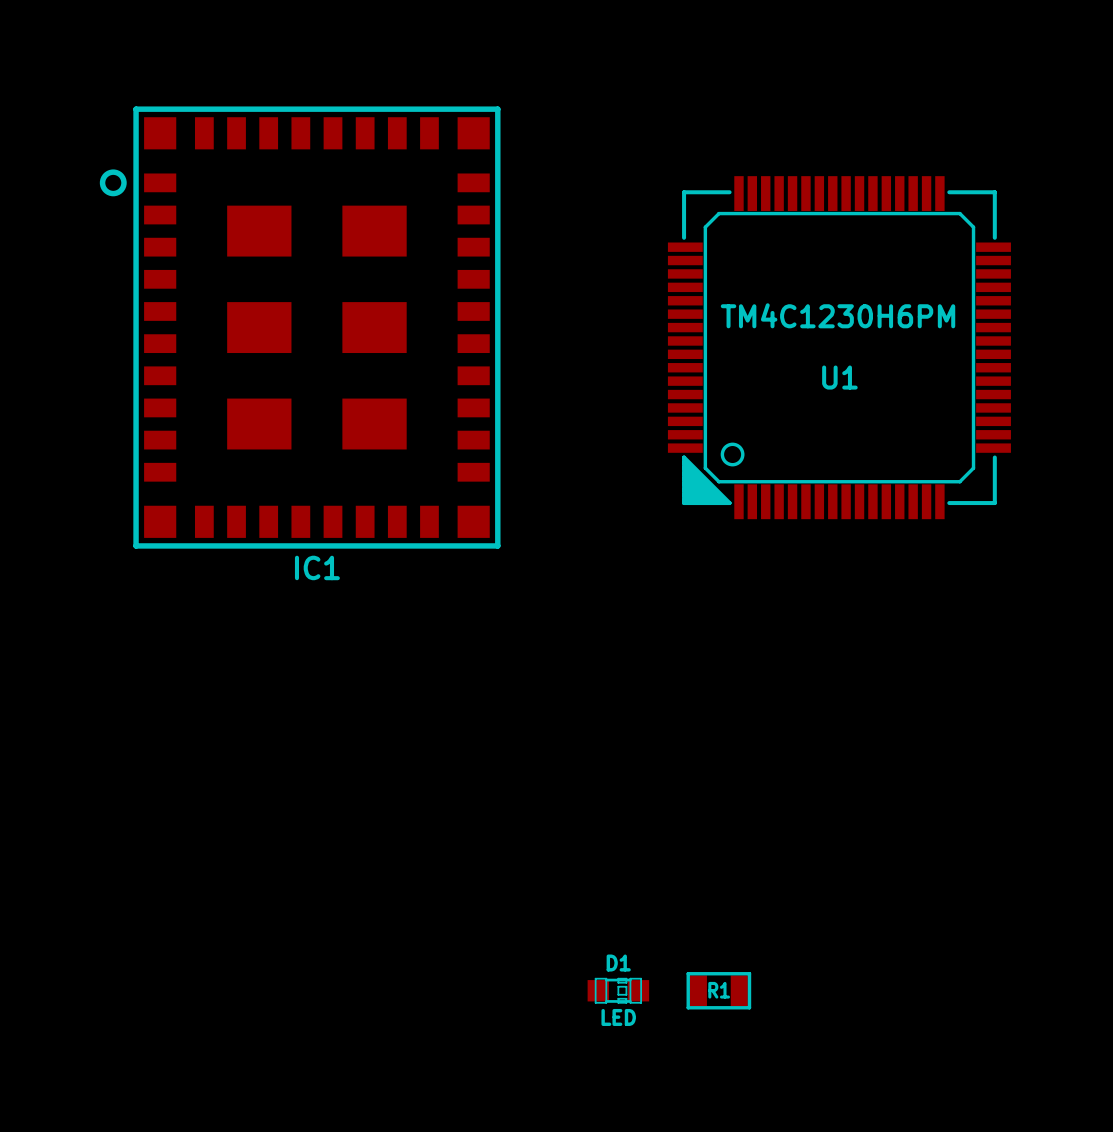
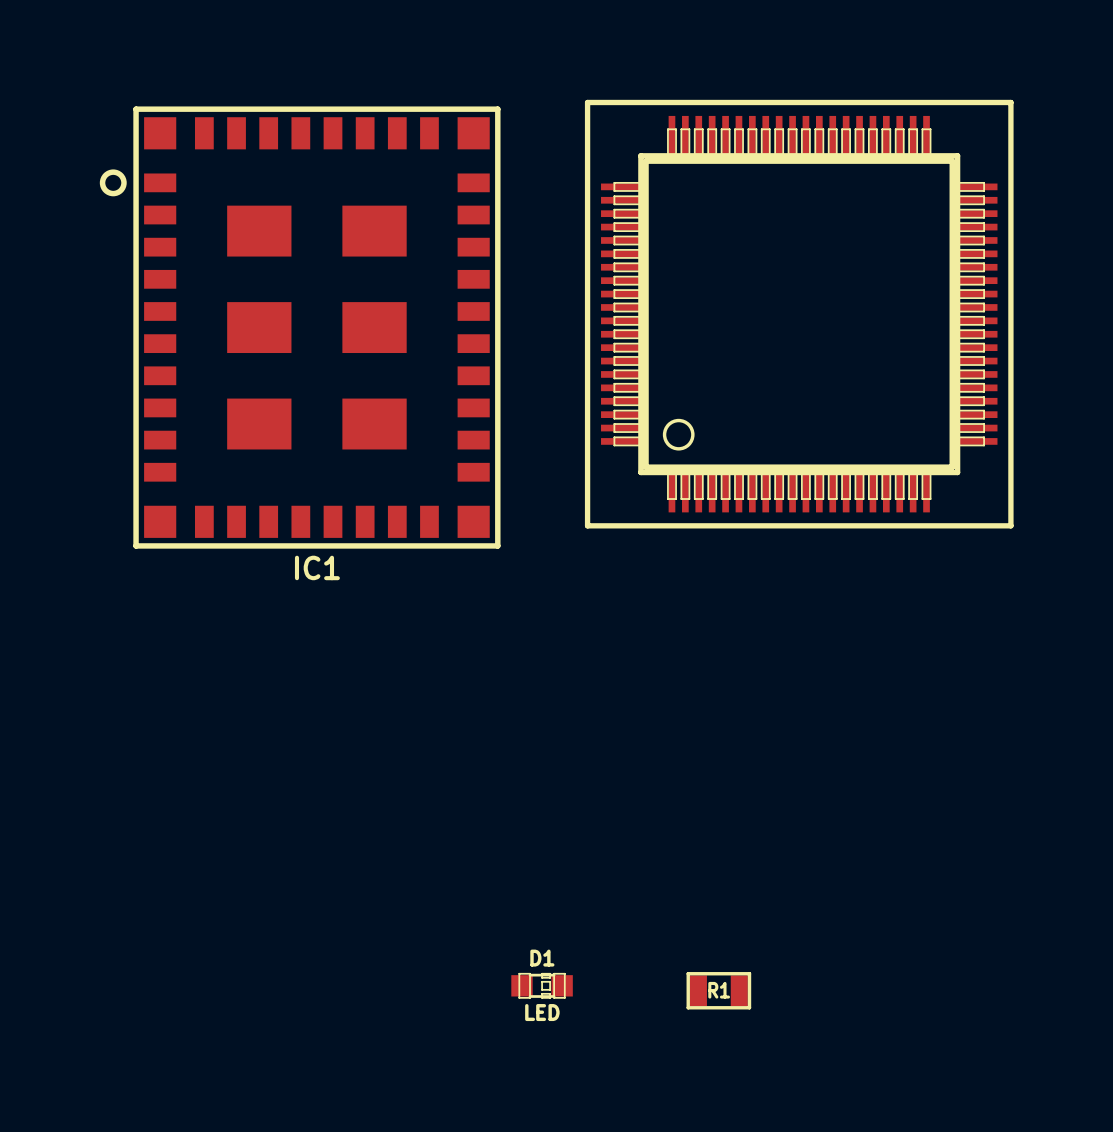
part: none -> (799, 314)
U1: TM4C1230H6PM (839, 347) -> none
D1 position: (618, 990) -> (542, 985)

